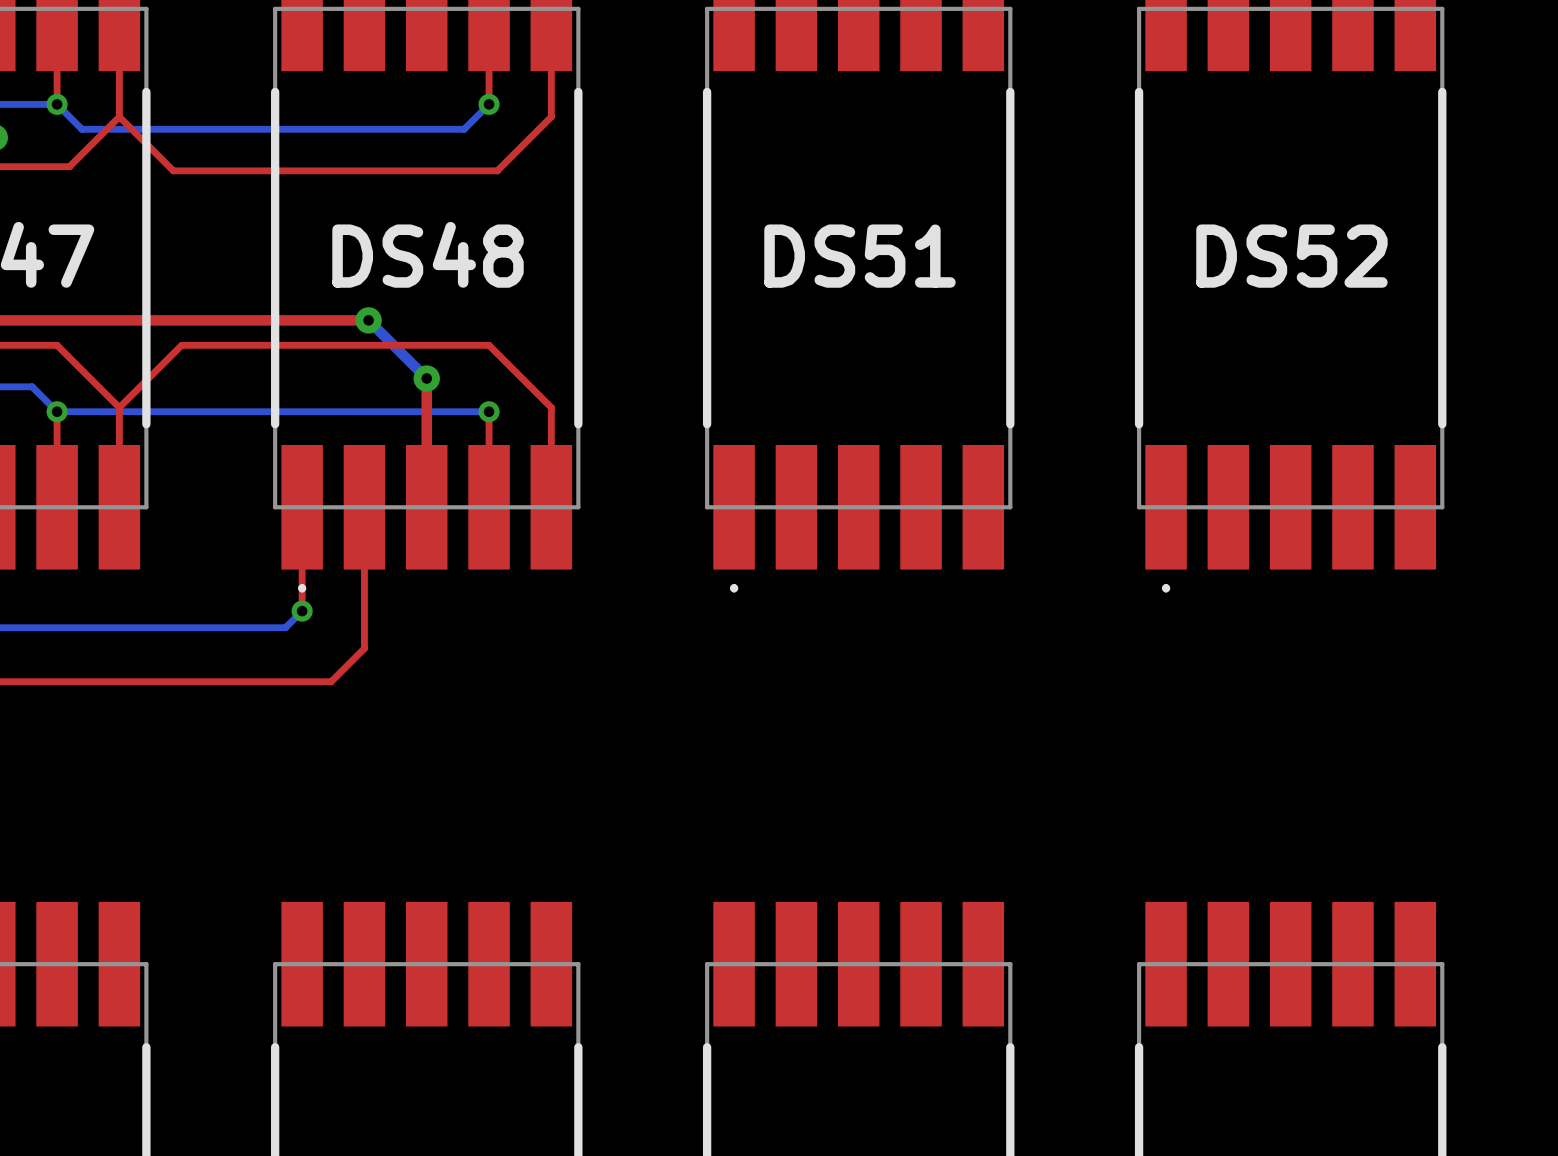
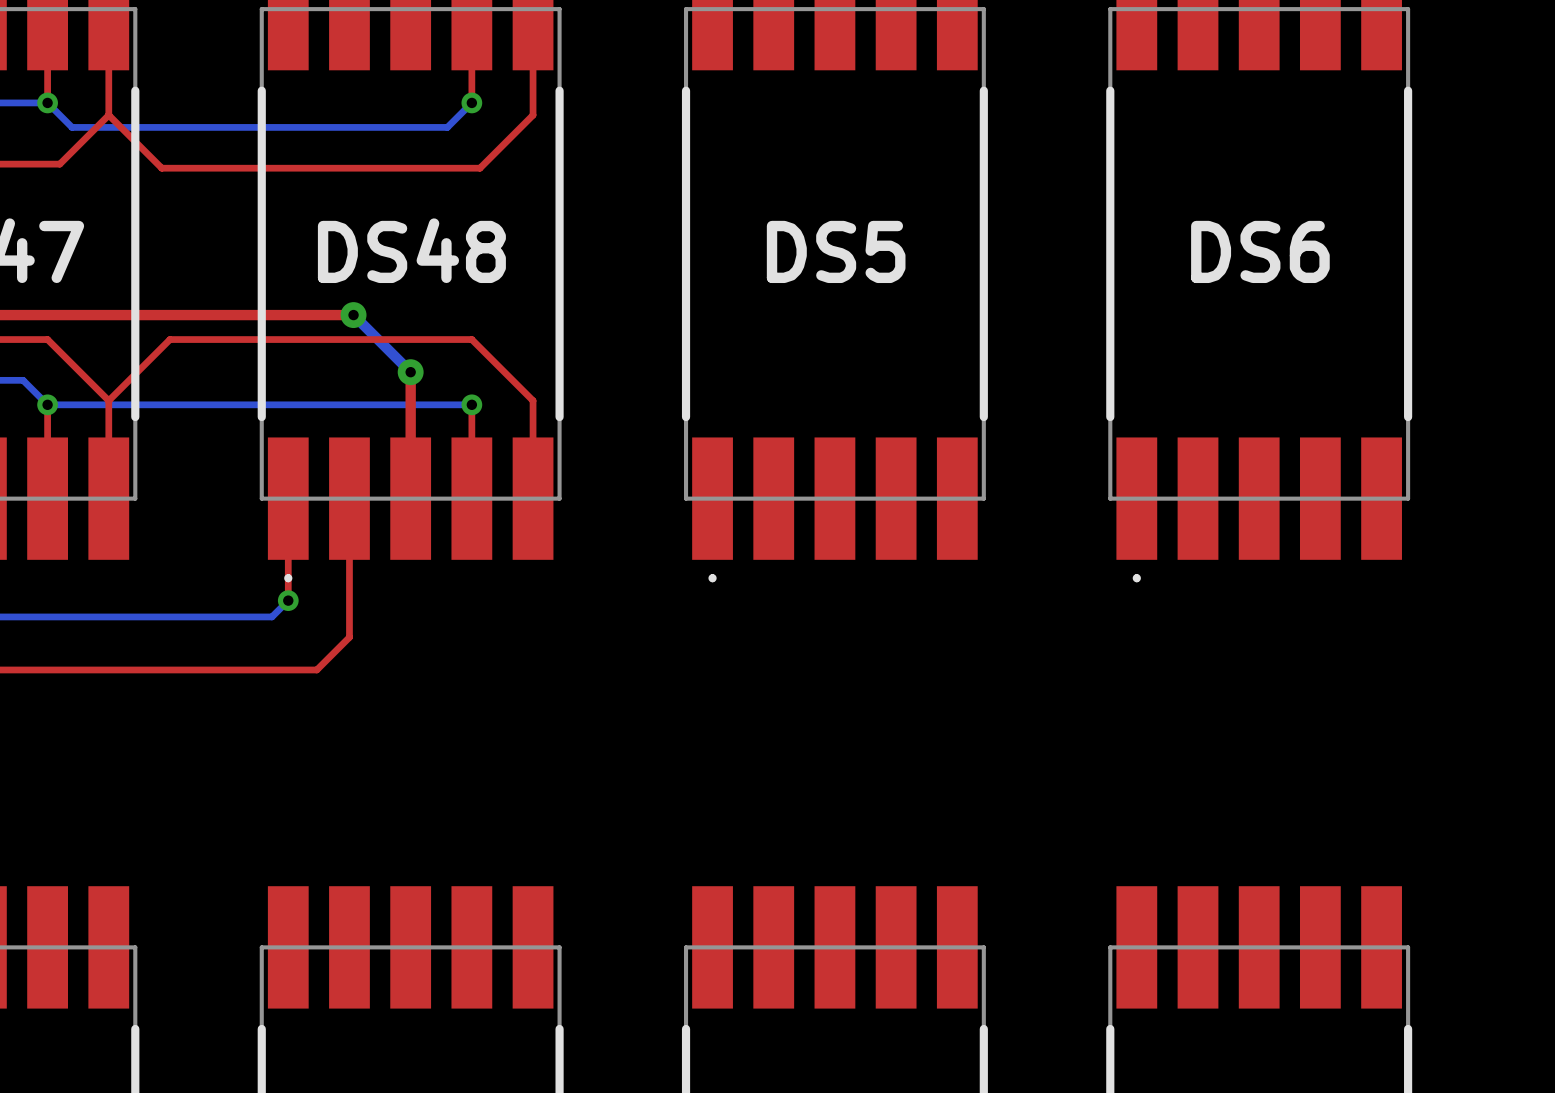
DS51 name: DS51 (859, 256) -> DS5 (836, 251)
DS52 name: DS52 (1291, 256) -> DS6 (1260, 251)

